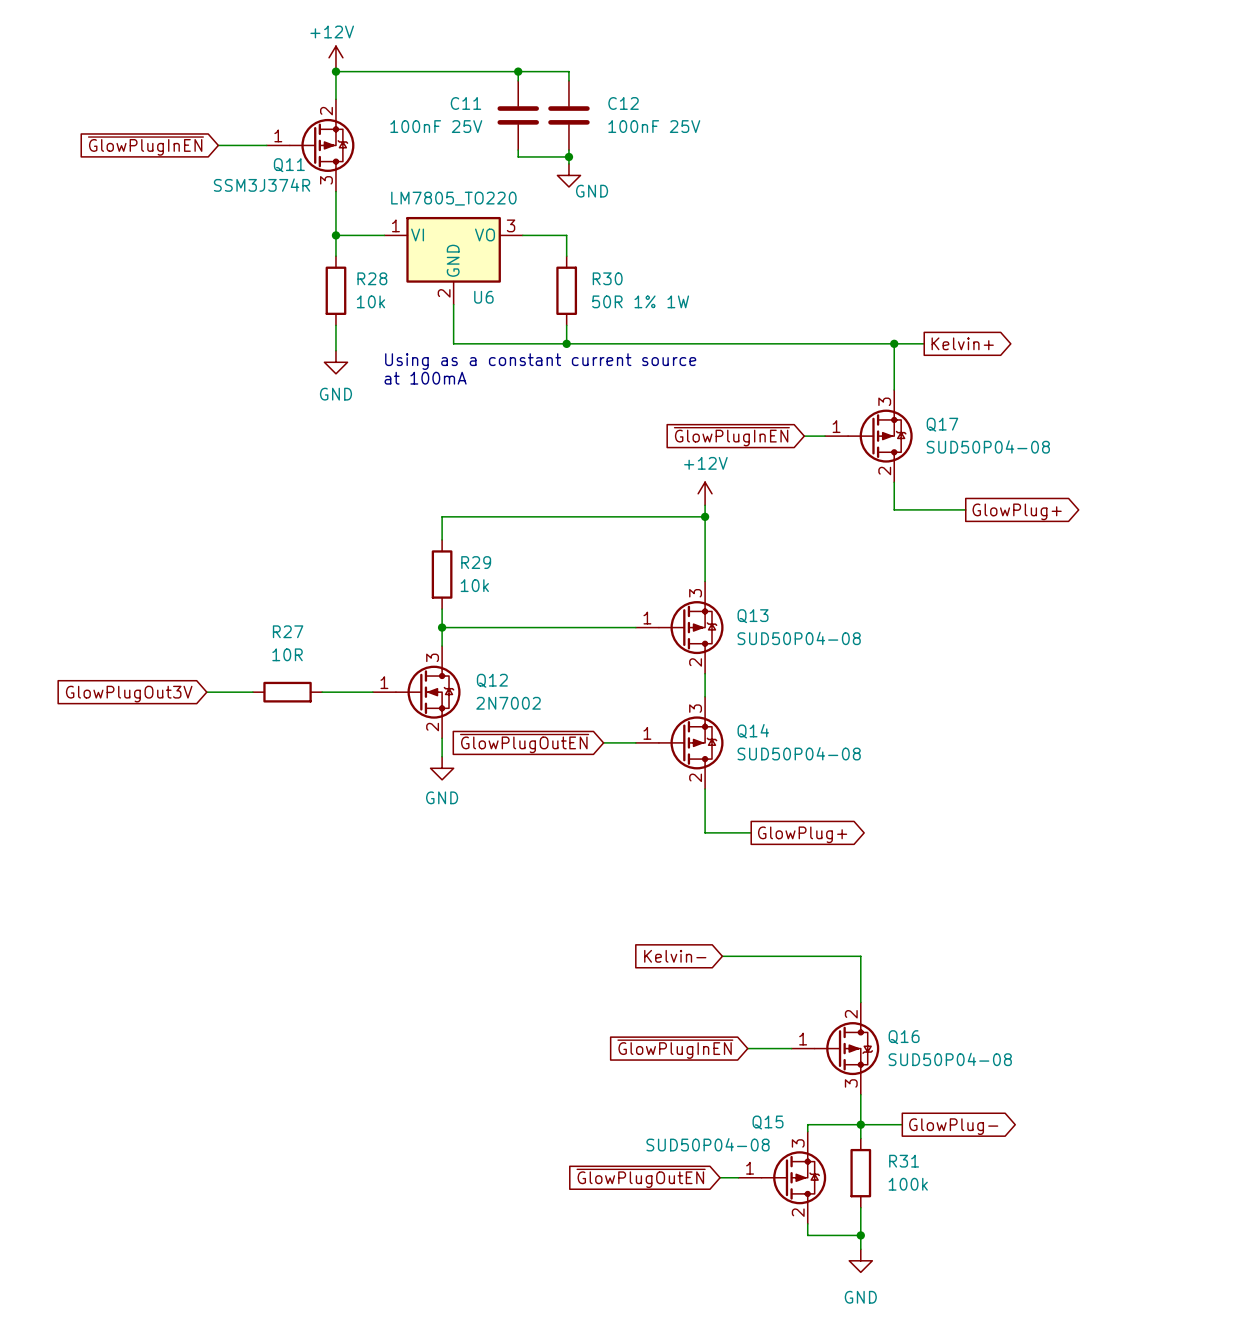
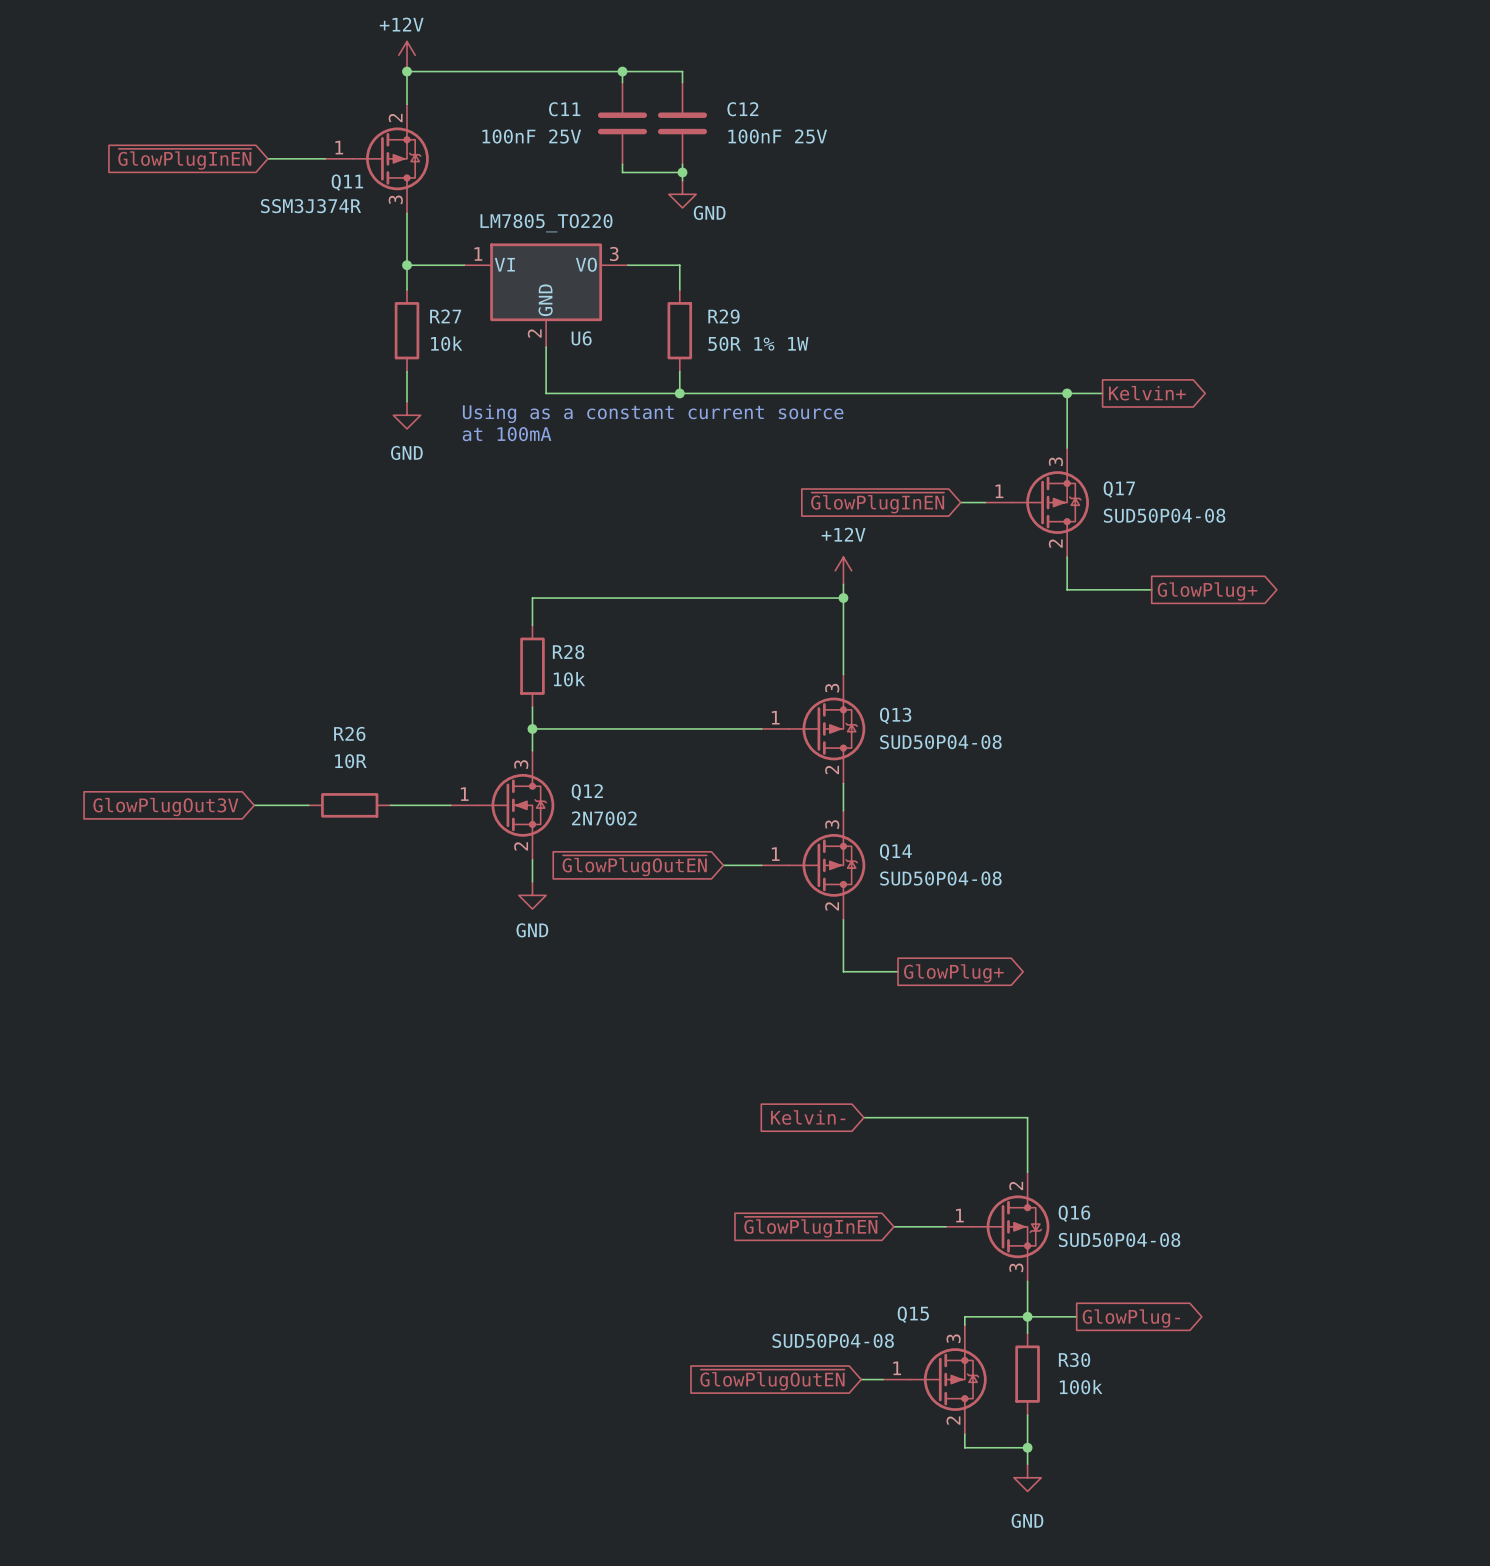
R28 name: R28 (372, 278) -> R27 (445, 316)
R30 name: R30 (607, 278) -> R29 (723, 316)
R29 name: R29 (476, 562) -> R28 (568, 652)
R27 name: R27 (288, 631) -> R26 (349, 733)
R31 name: R31 (904, 1161) -> R30 (1074, 1359)

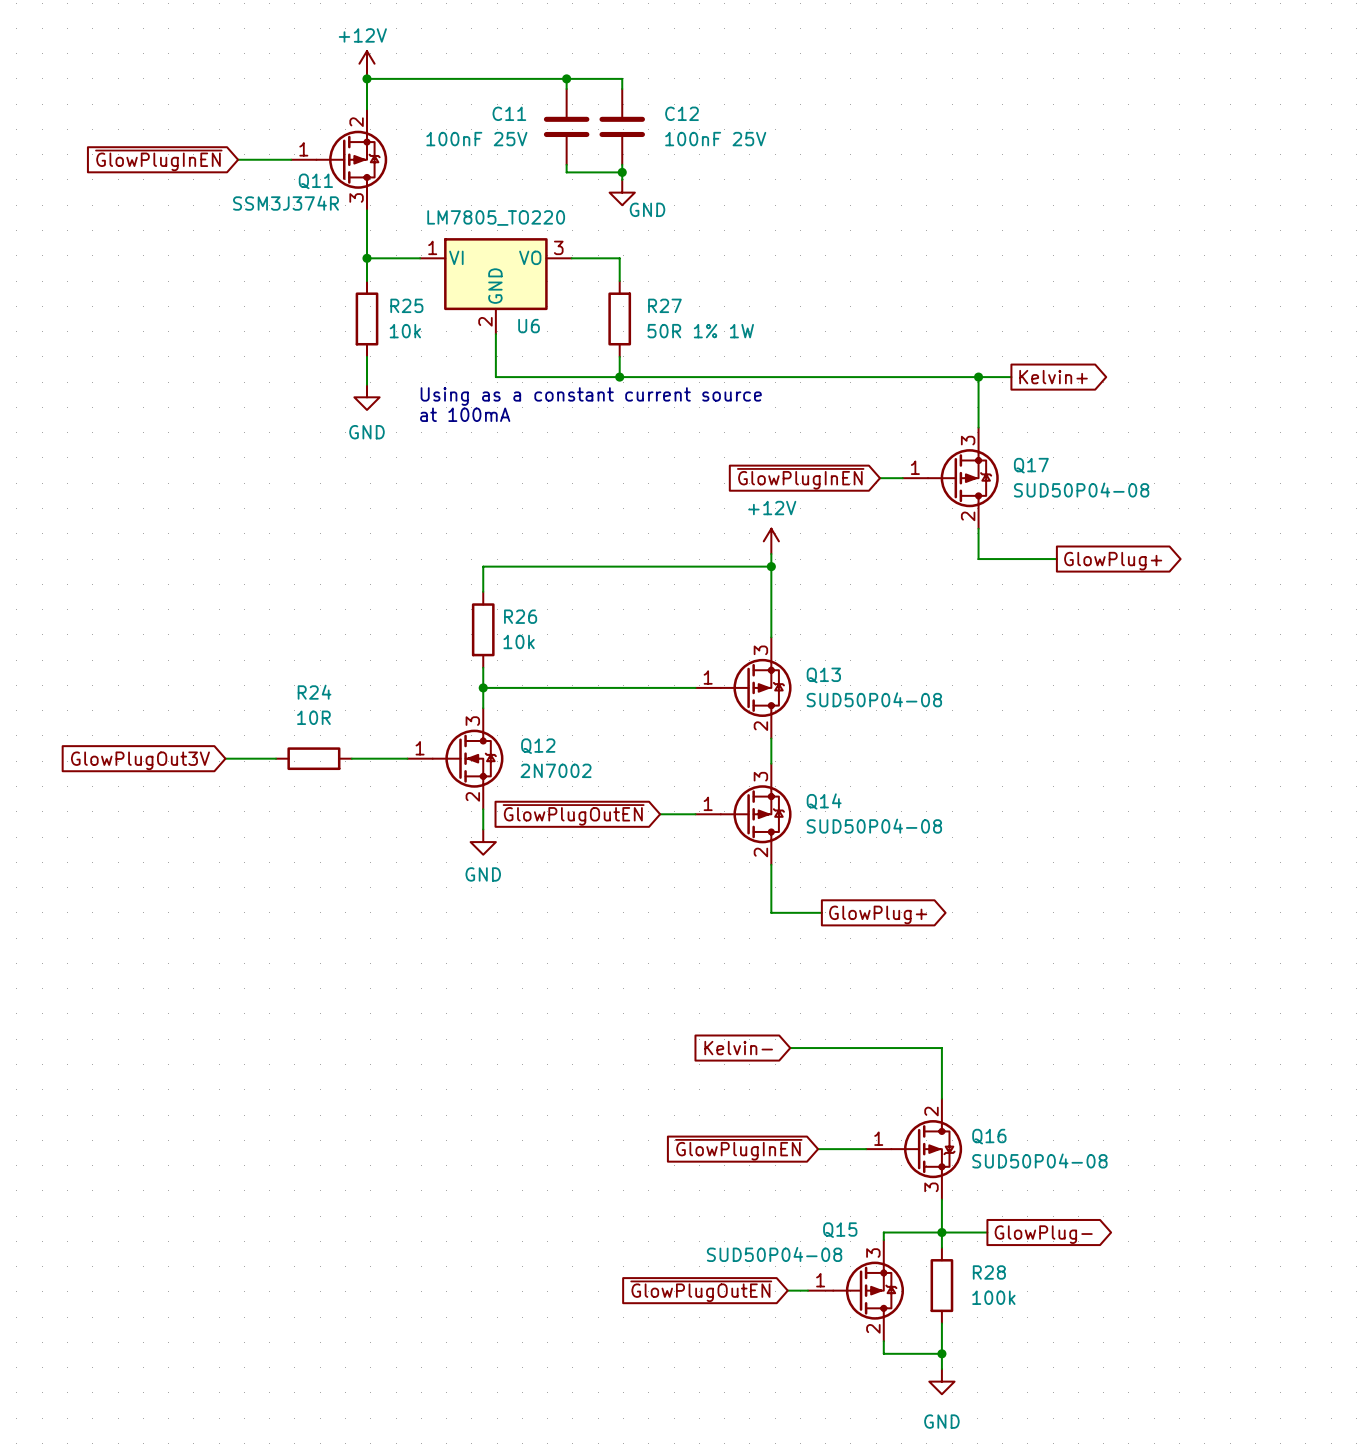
R27 name: R27 (445, 316) -> R25 (406, 305)
R29 name: R29 (723, 316) -> R27 (664, 305)
R28 name: R28 (568, 652) -> R26 (520, 616)
R26 name: R26 (349, 733) -> R24 (314, 692)
R30 name: R30 (1074, 1359) -> R28 (989, 1272)

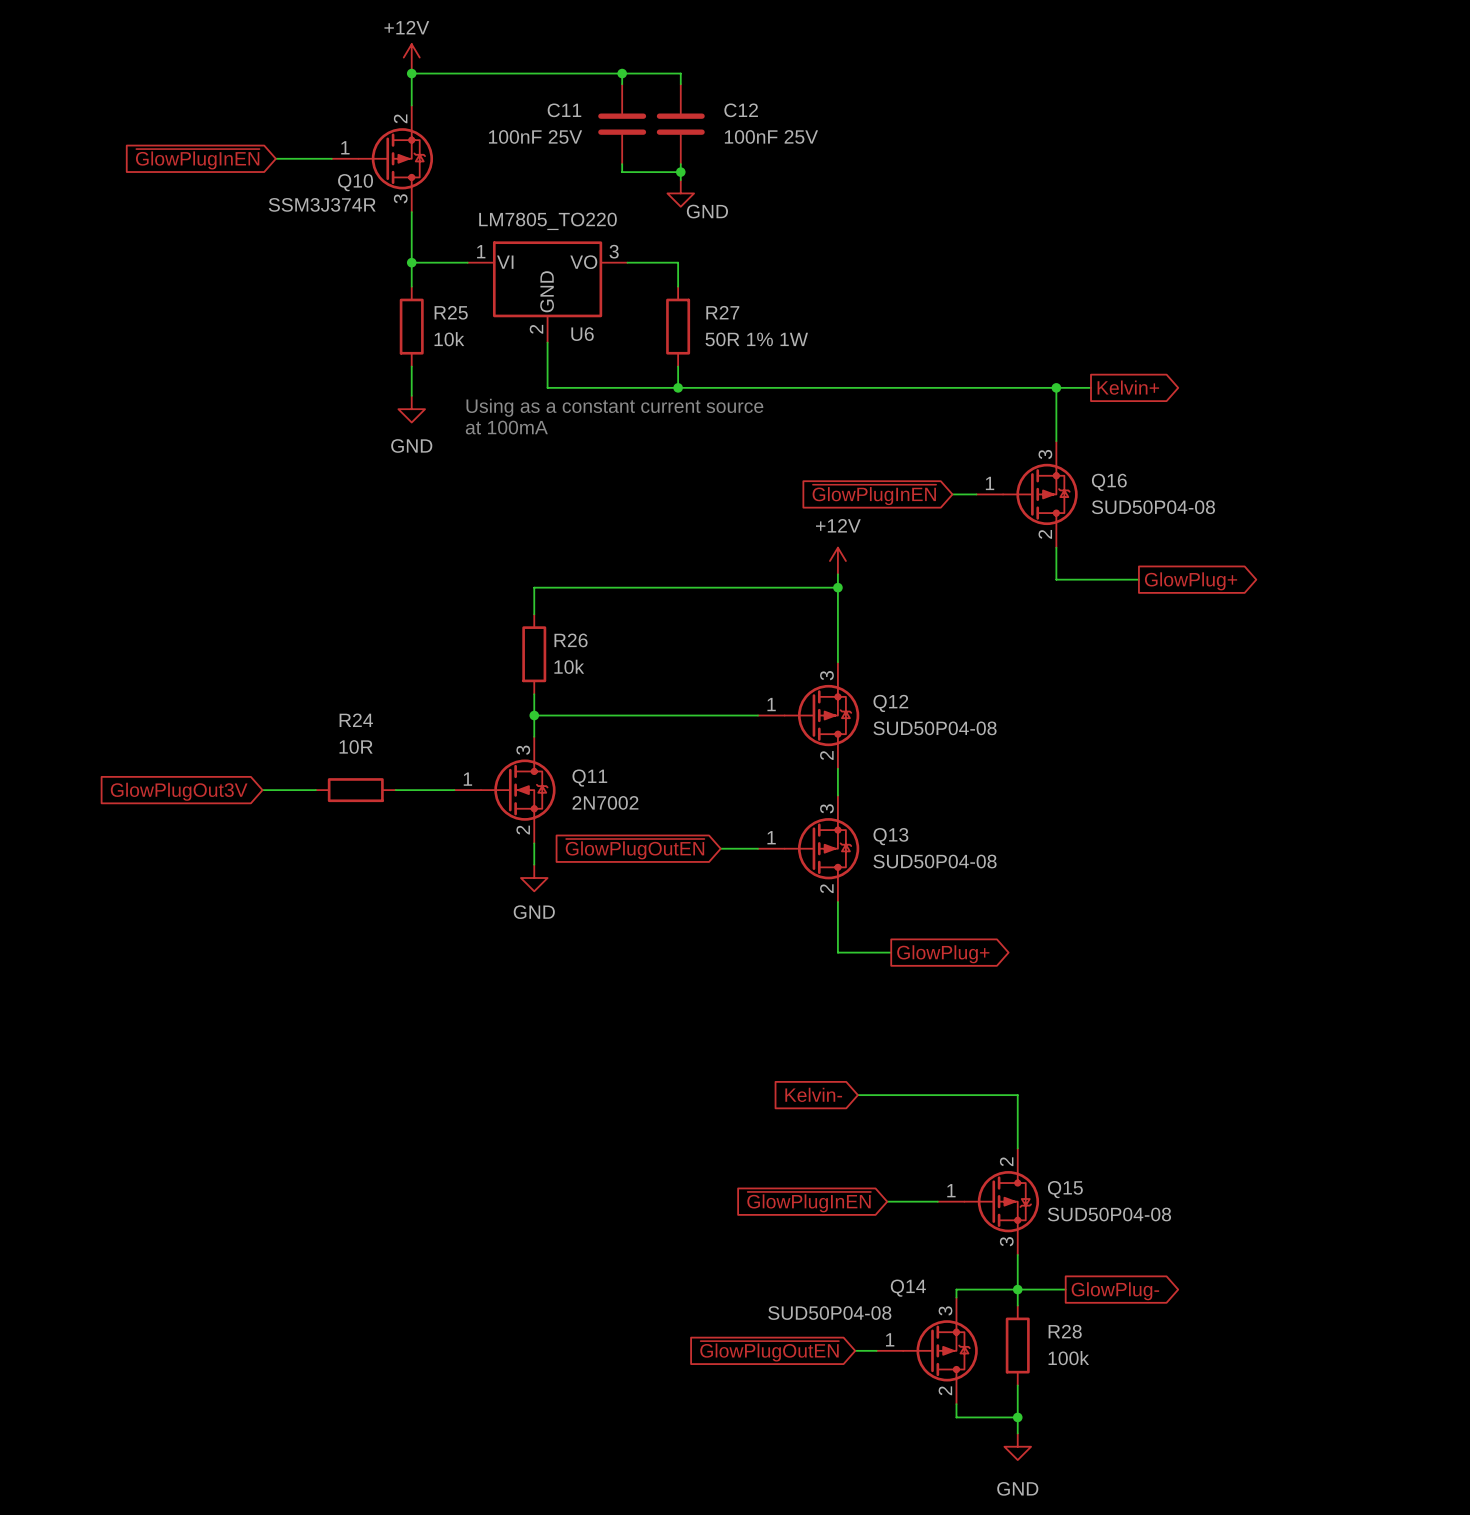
Q11 name: Q11 (315, 181) -> Q10 (355, 182)
Q17 name: Q17 (1031, 465) -> Q16 (1109, 482)
Q13 name: Q13 (823, 675) -> Q12 (890, 703)
Q12 name: Q12 (538, 746) -> Q11 (589, 778)
Q14 name: Q14 (824, 801) -> Q13 (890, 836)
Q16 name: Q16 (989, 1136) -> Q15 (1065, 1189)
Q15 name: Q15 (840, 1230) -> Q14 (908, 1288)

